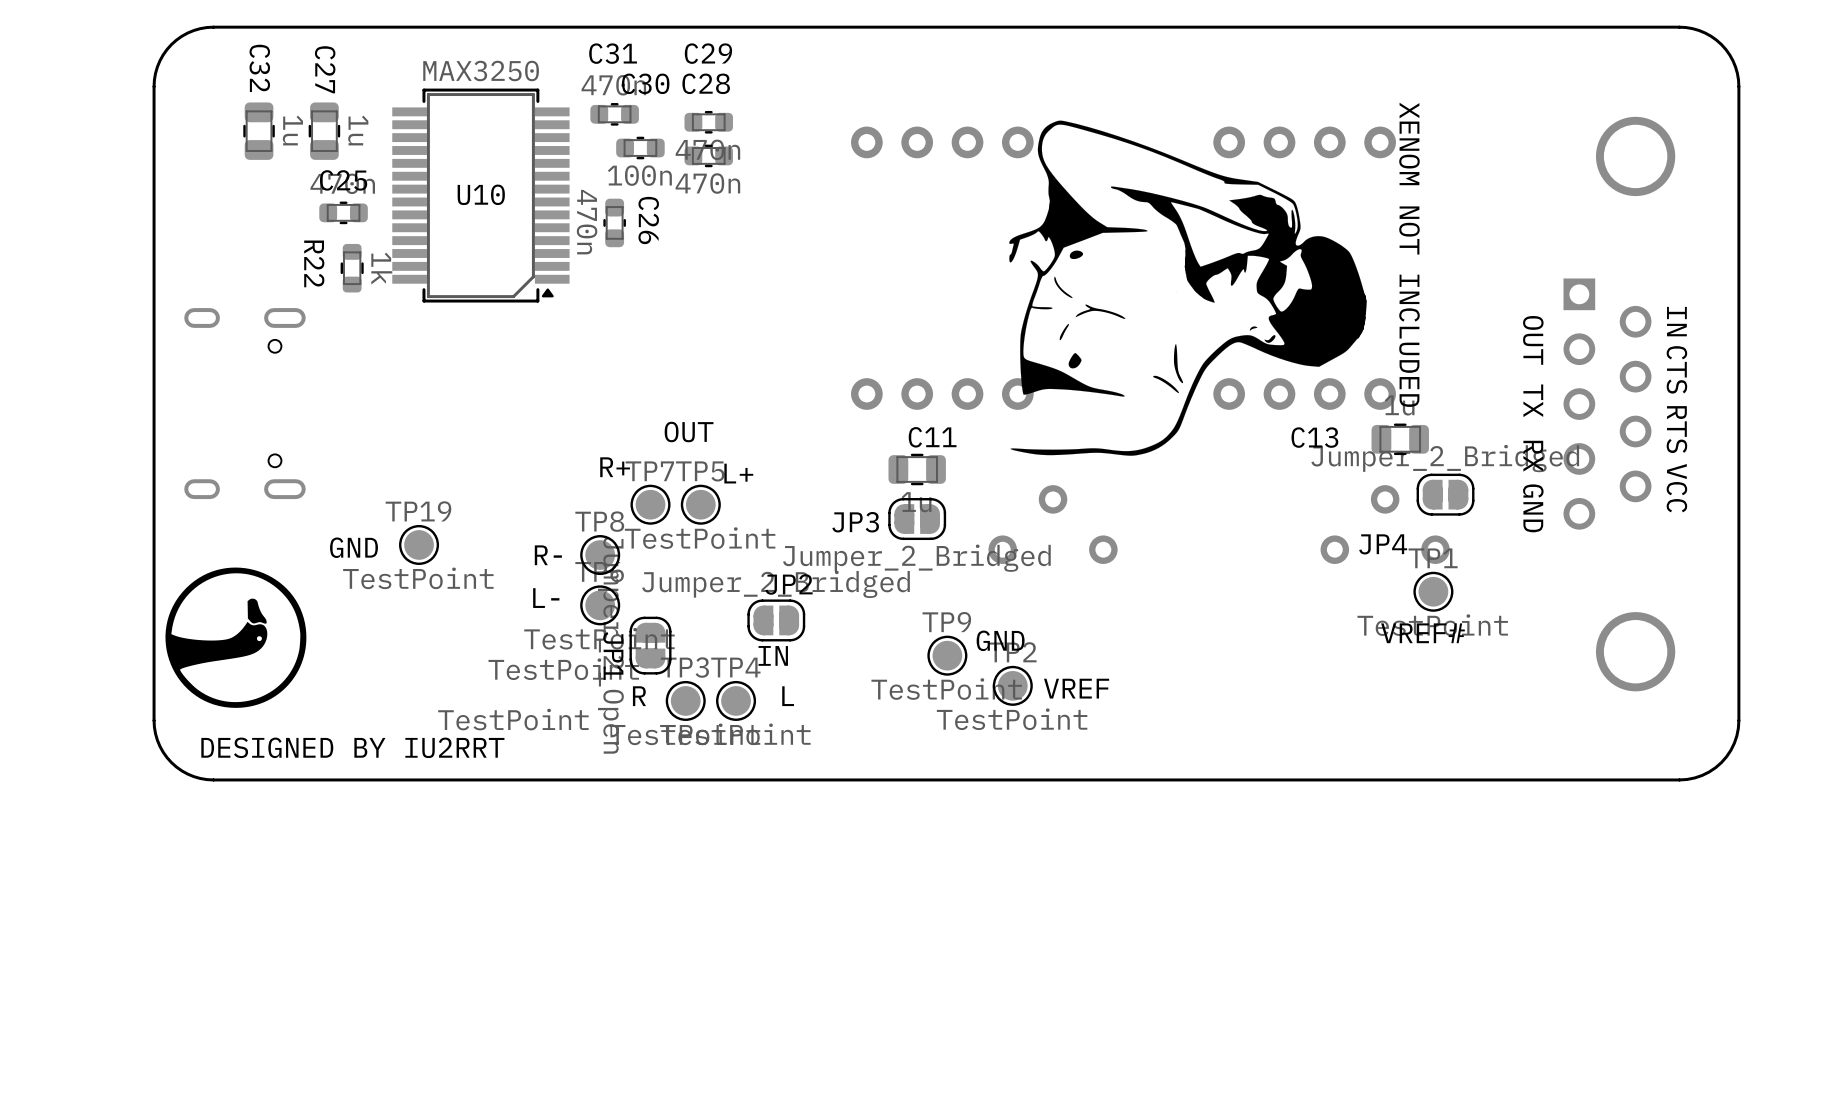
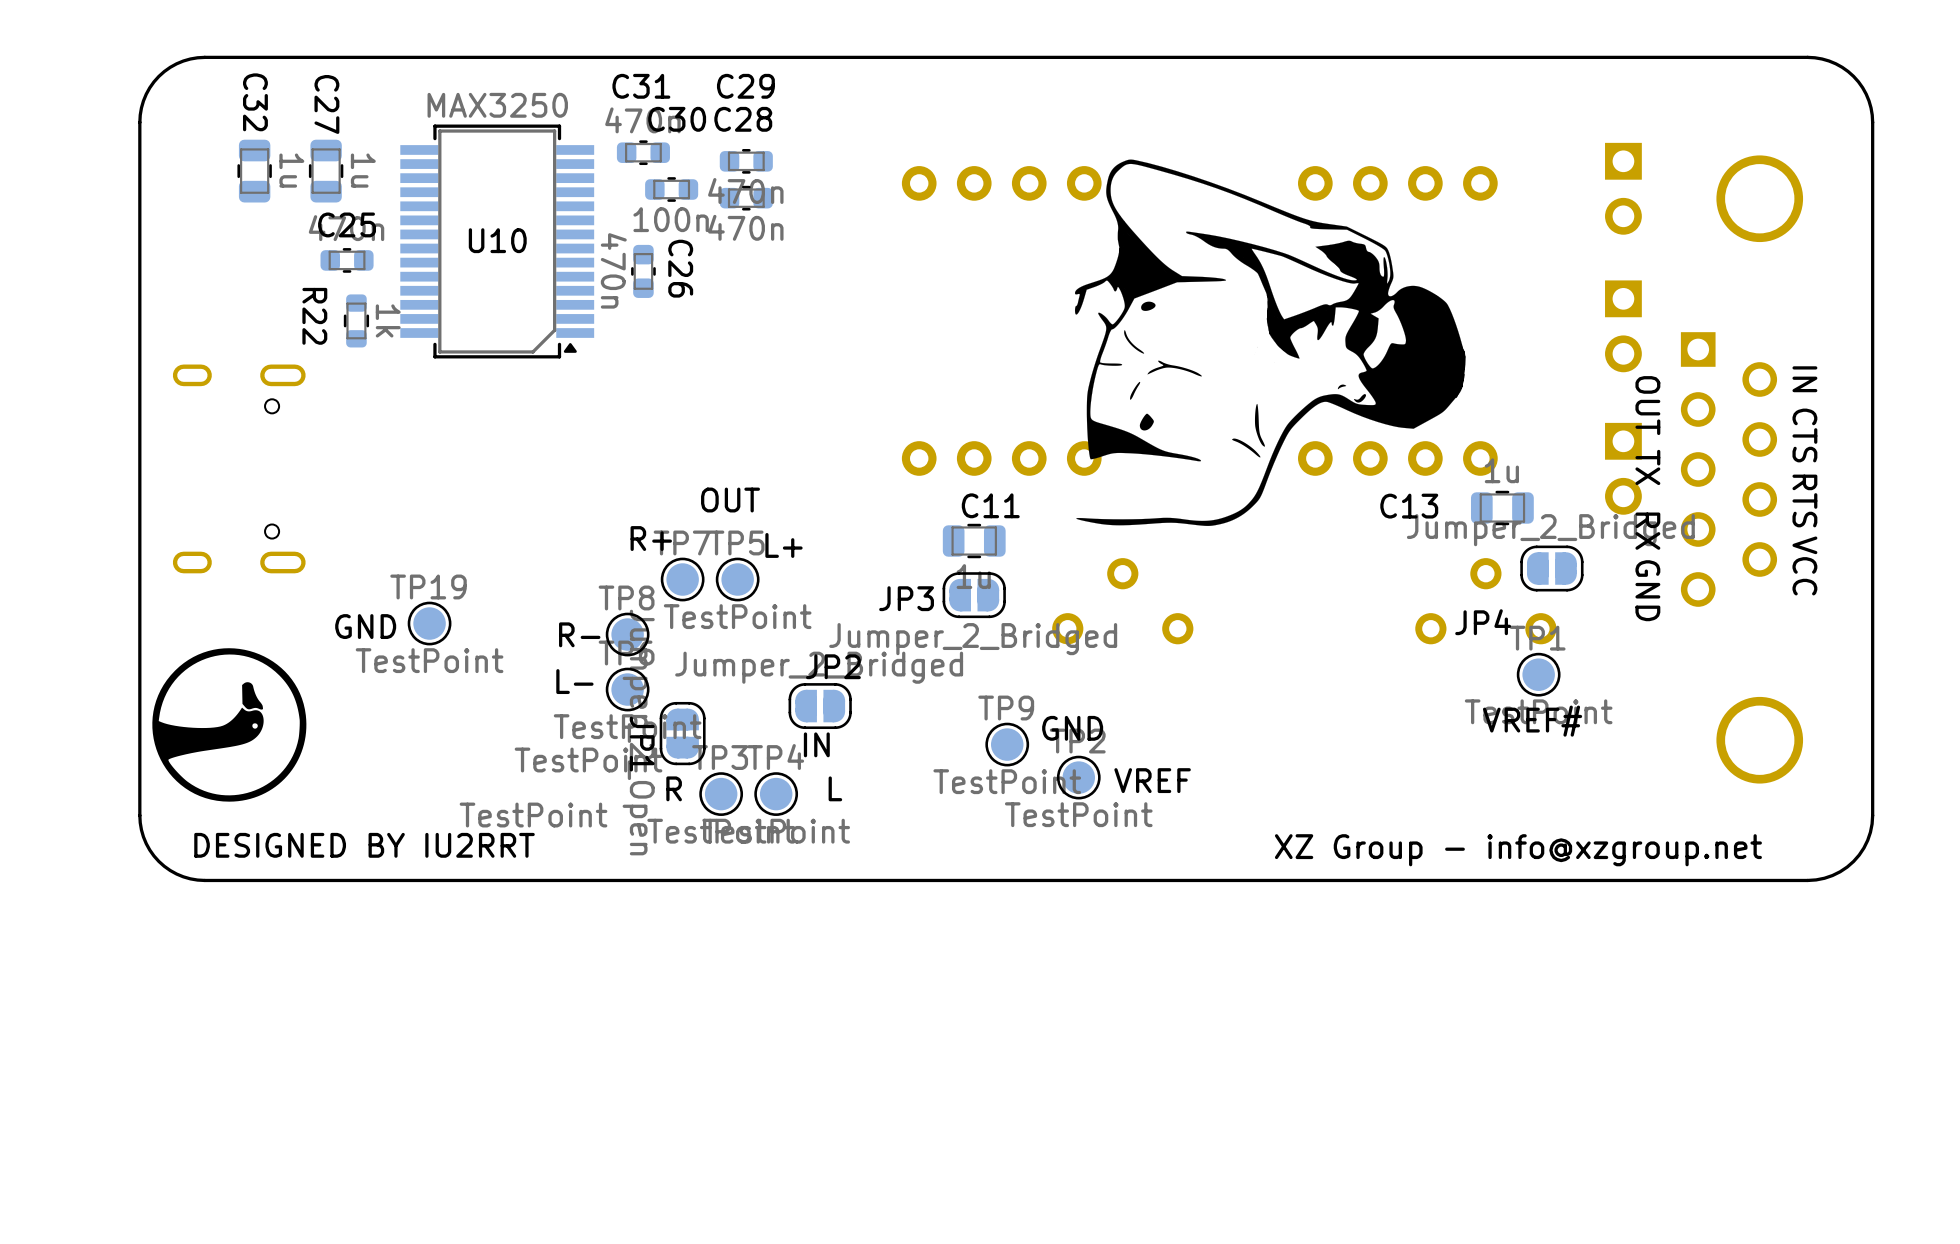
part: none -> (1623, 188)
text: XENOM NOT INCLUDED (1409, 254) -> none
part: none -> (1623, 326)
part: none -> (1623, 468)
text: none -> XZ Group - info@xzgroup.net (1518, 850)

